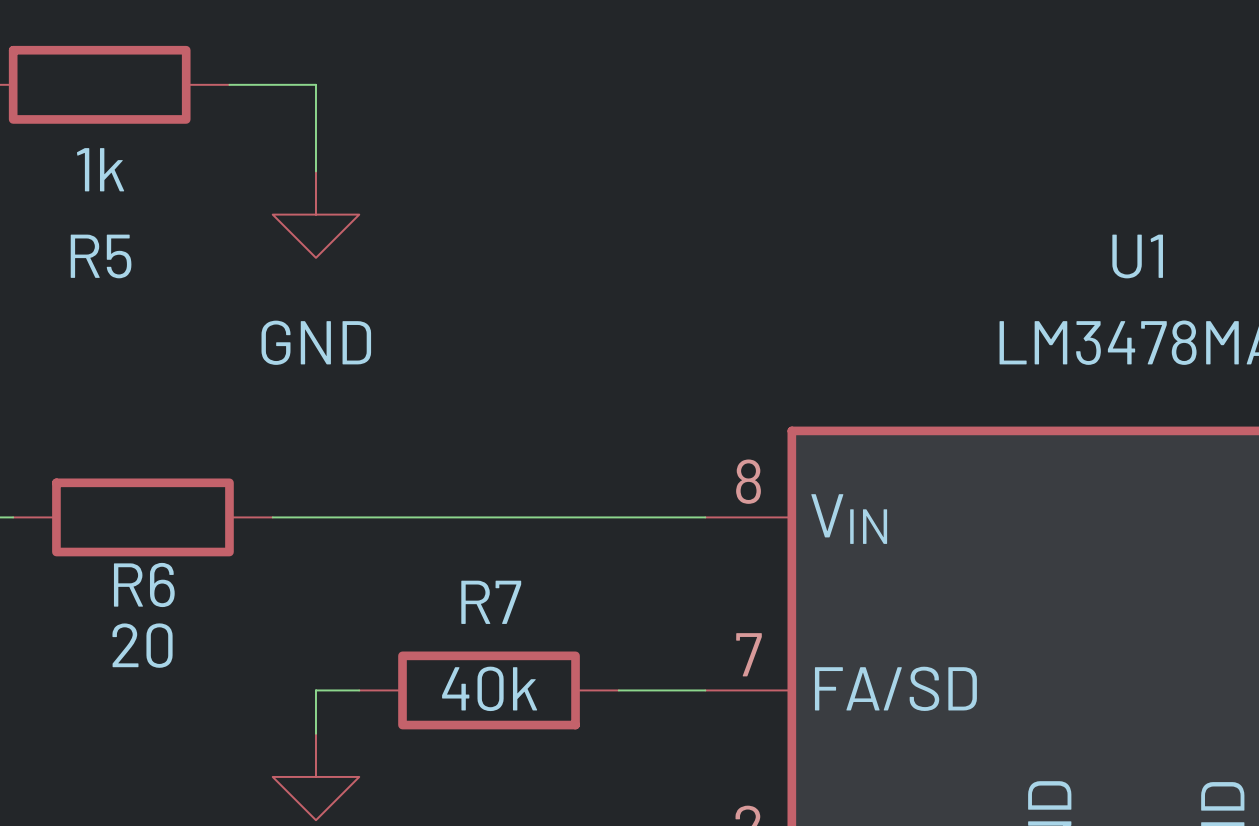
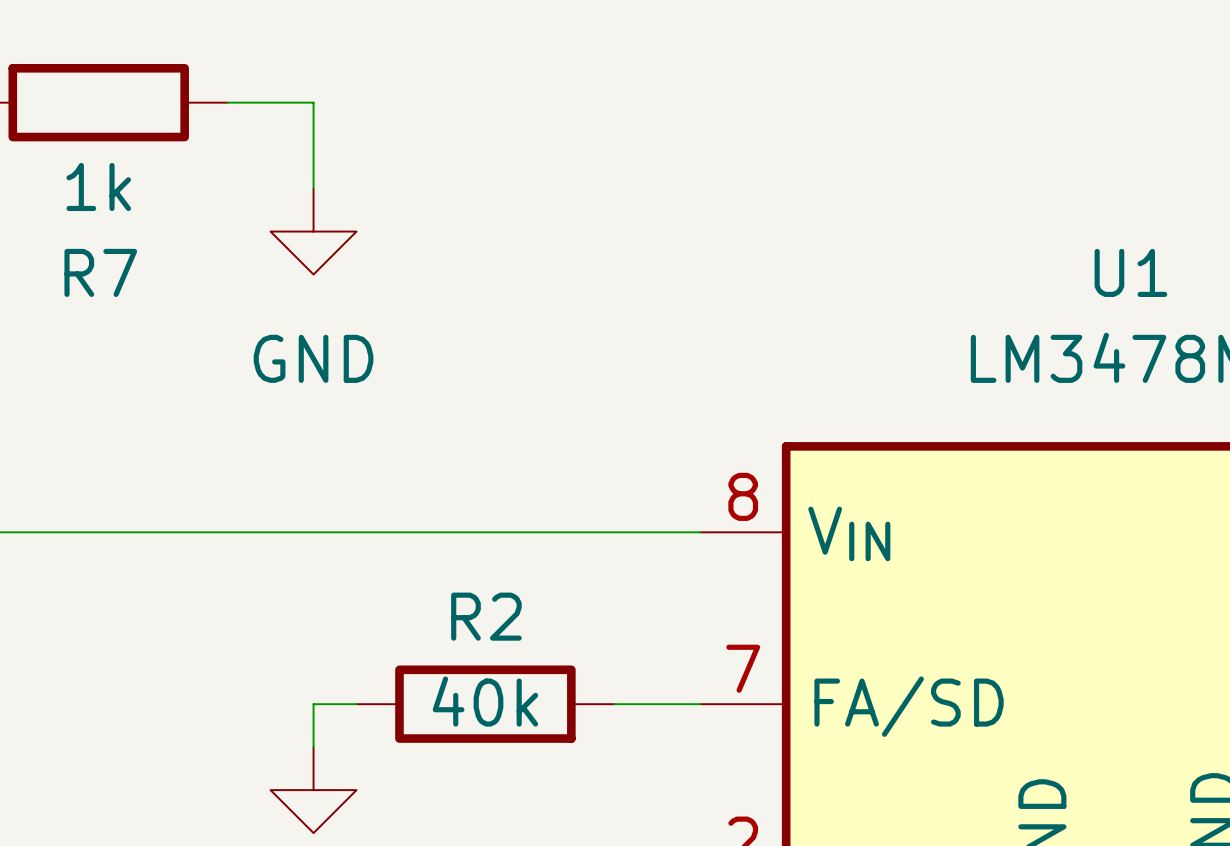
R5 name: R5 (101, 256) -> R7 (100, 272)
wire: none -> (12, 532) (270, 532)
R6: 20 (142, 517) -> none
R7 name: R7 (491, 602) -> R2 (486, 616)

